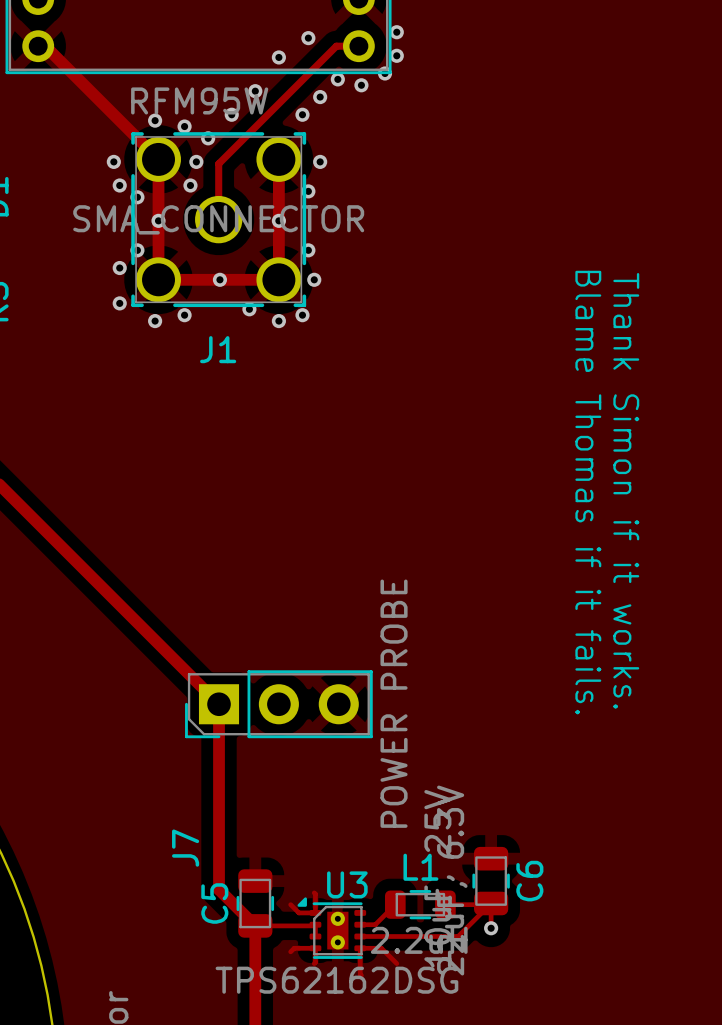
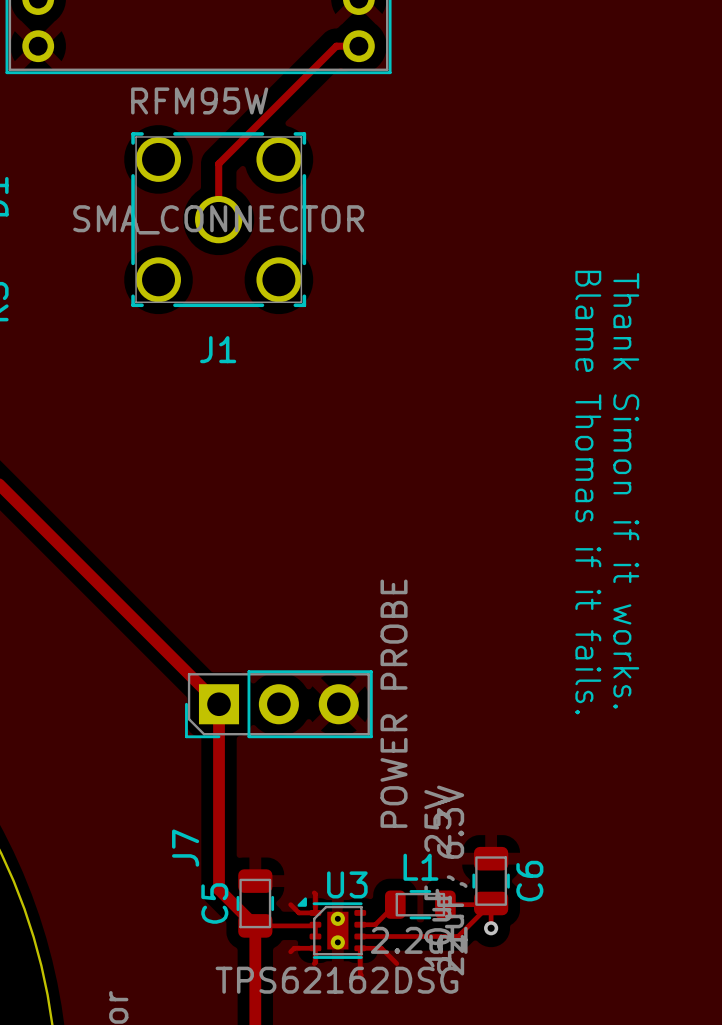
via: (396, 32) -> none
via: (308, 38) -> none
track: (38, 46) (45, 46) (158, 159) (158, 279) (278, 279) (278, 159) -> none
via: (396, 55) -> none
via: (278, 57) -> none
via: (385, 73) -> none
via: (337, 79) -> none
via: (361, 85) -> none
via: (255, 91) -> none
via: (320, 97) -> none
via: (231, 114) -> none
via: (302, 114) -> none
via: (155, 120) -> none
via: (184, 126) -> none
via: (208, 138) -> none
via: (113, 161) -> none
via: (196, 161) -> none
via: (320, 161) -> none
via: (119, 185) -> none
via: (190, 185) -> none
via: (308, 191) -> none
via: (137, 197) -> none
via: (158, 220) -> none
via: (278, 220) -> none
via: (137, 250) -> none
via: (308, 250) -> none
via: (119, 268) -> none
via: (219, 279) -> none
via: (314, 279) -> none
via: (119, 303) -> none
via: (249, 309) -> none
via: (184, 315) -> none
via: (302, 315) -> none
via: (155, 321) -> none
via: (278, 321) -> none

